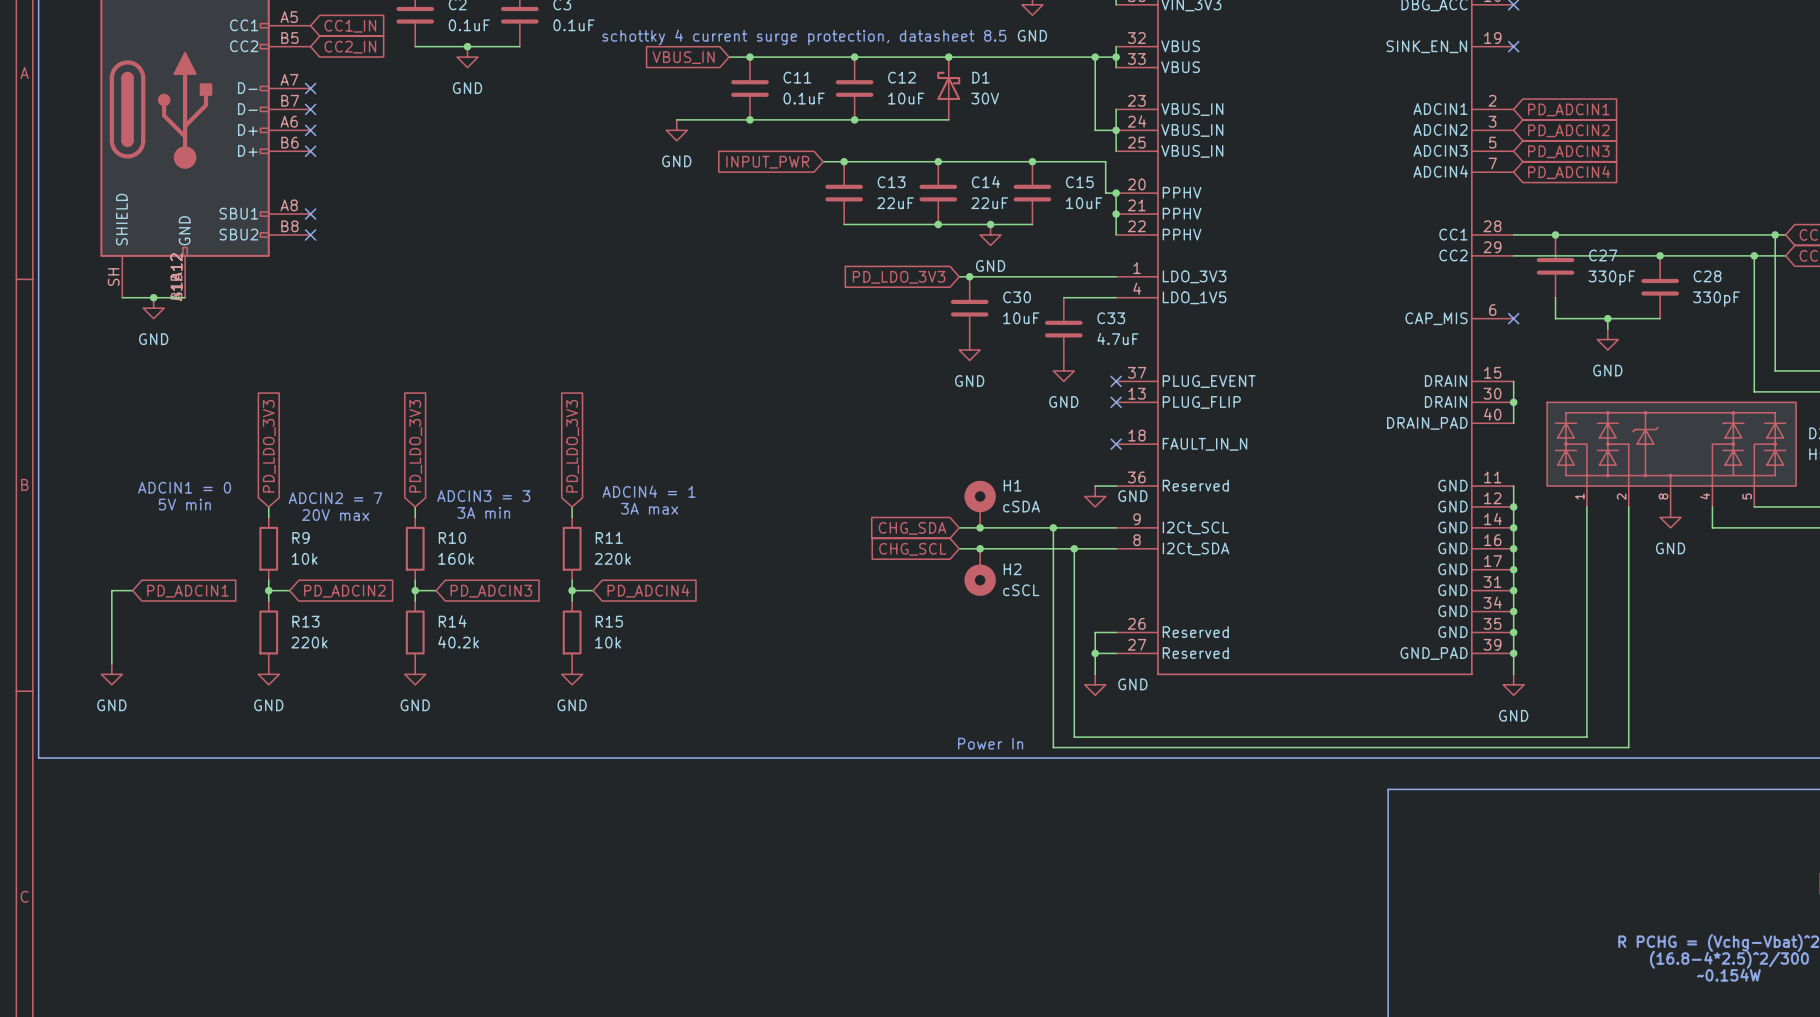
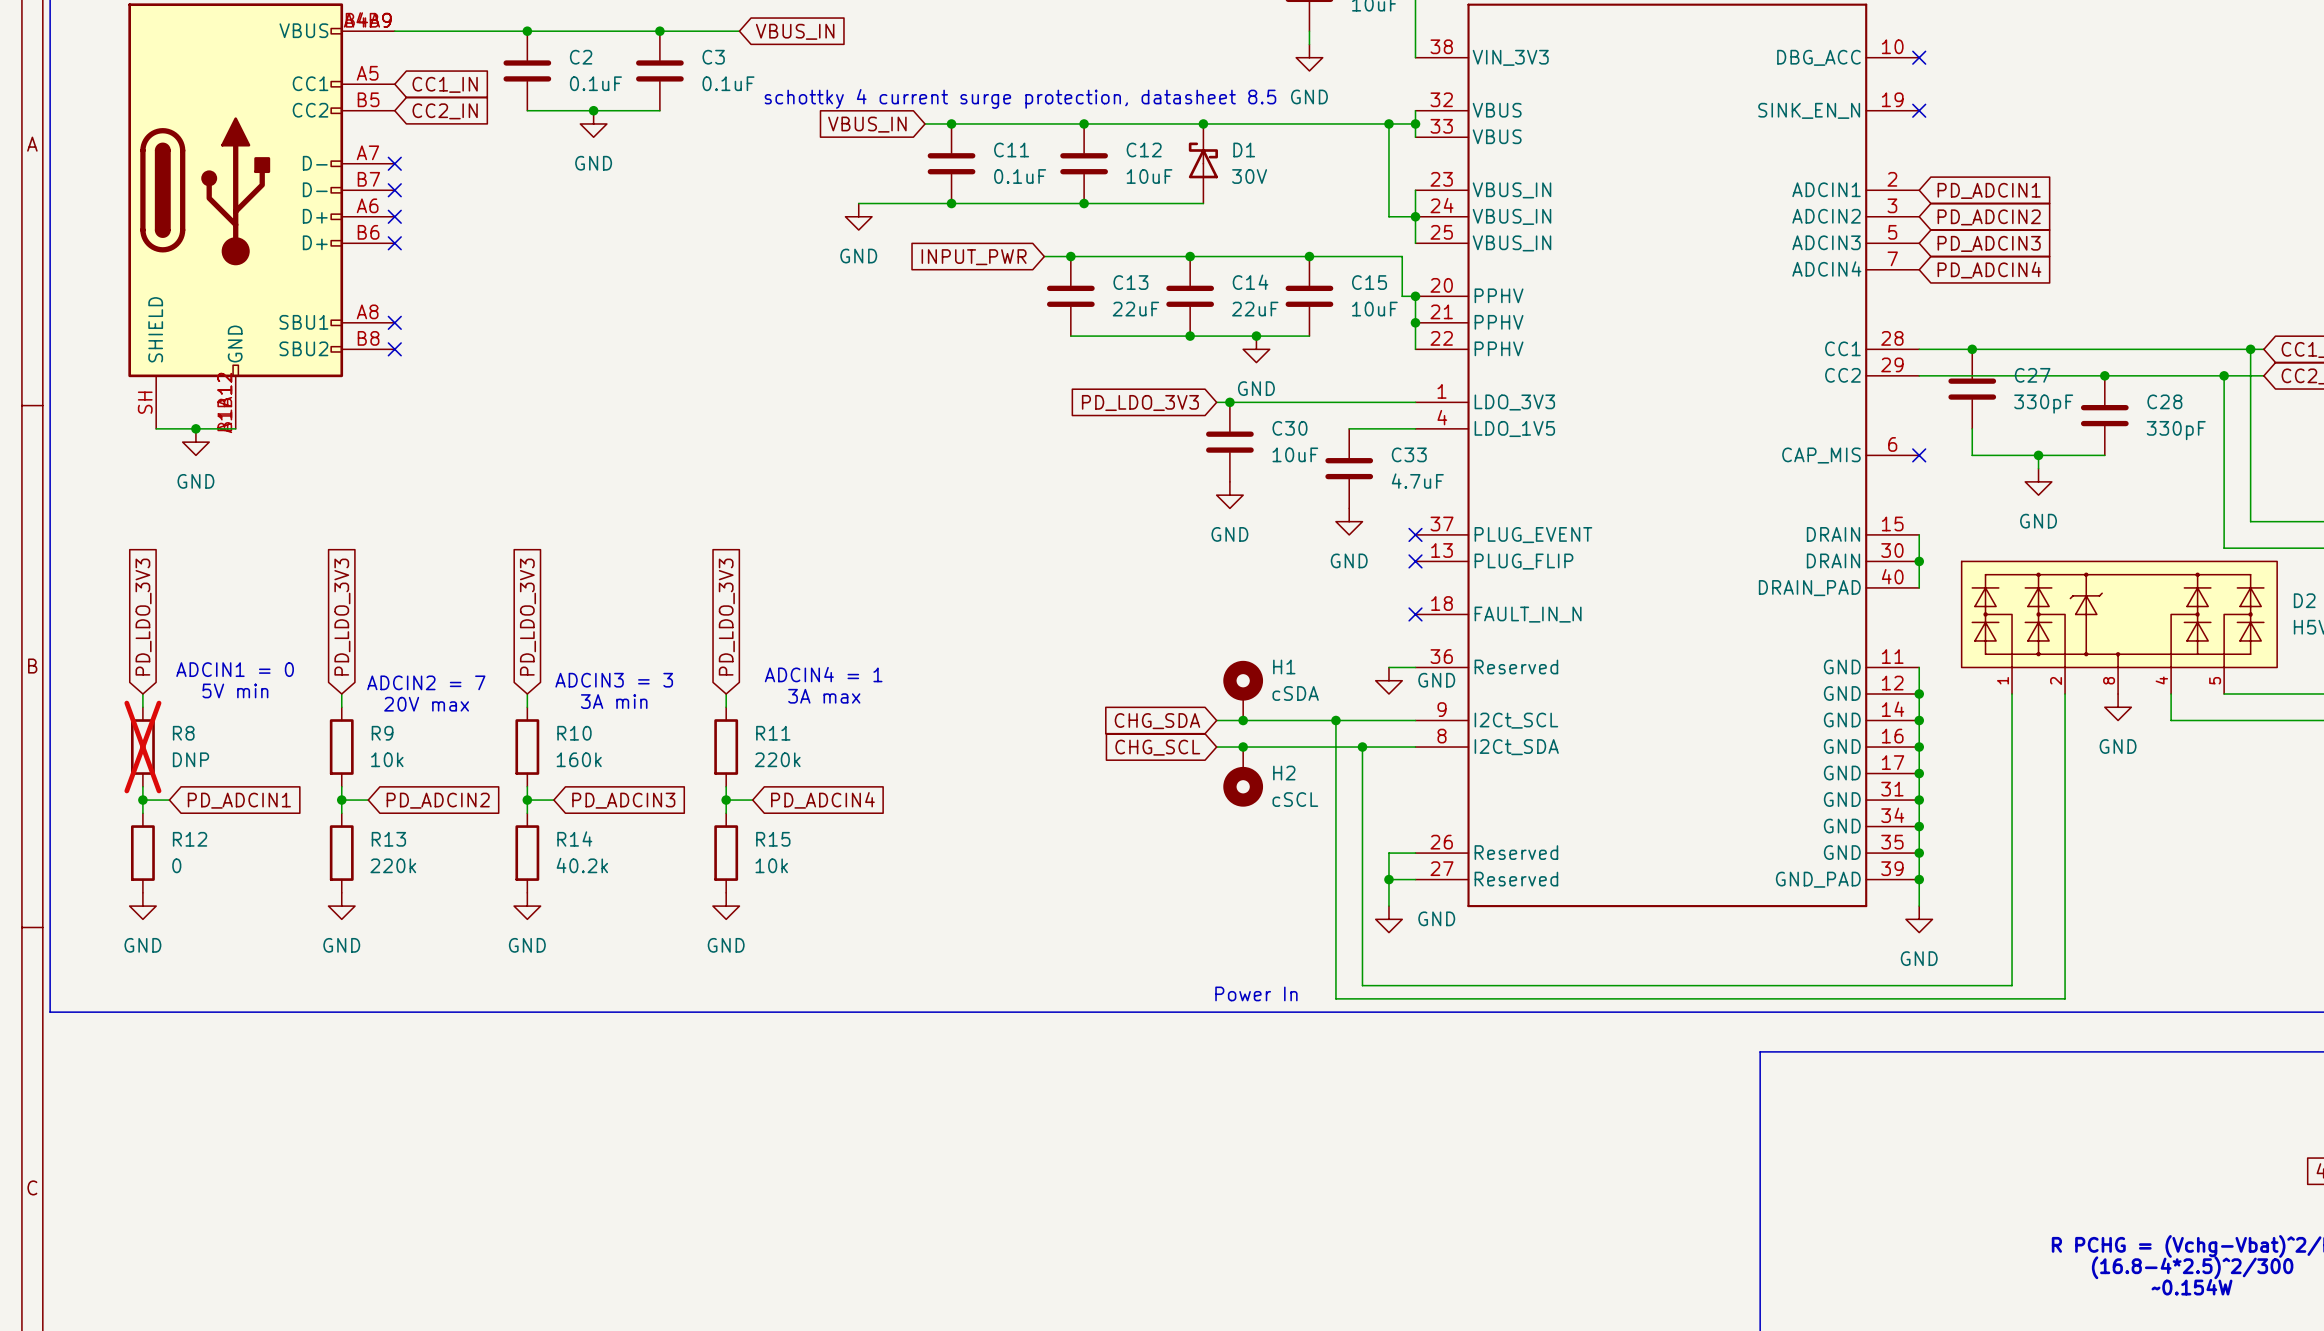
global label: none -> PD_LDO_3V3 (143, 617)
wire: none -> (142, 693) (142, 707)
R8: none -> DNP (142, 747)
wire: none -> (142, 786) (142, 800)
junction: none -> (142, 800)
wire: (111, 601) (111, 663) -> none
R12: none -> 0 (142, 853)

